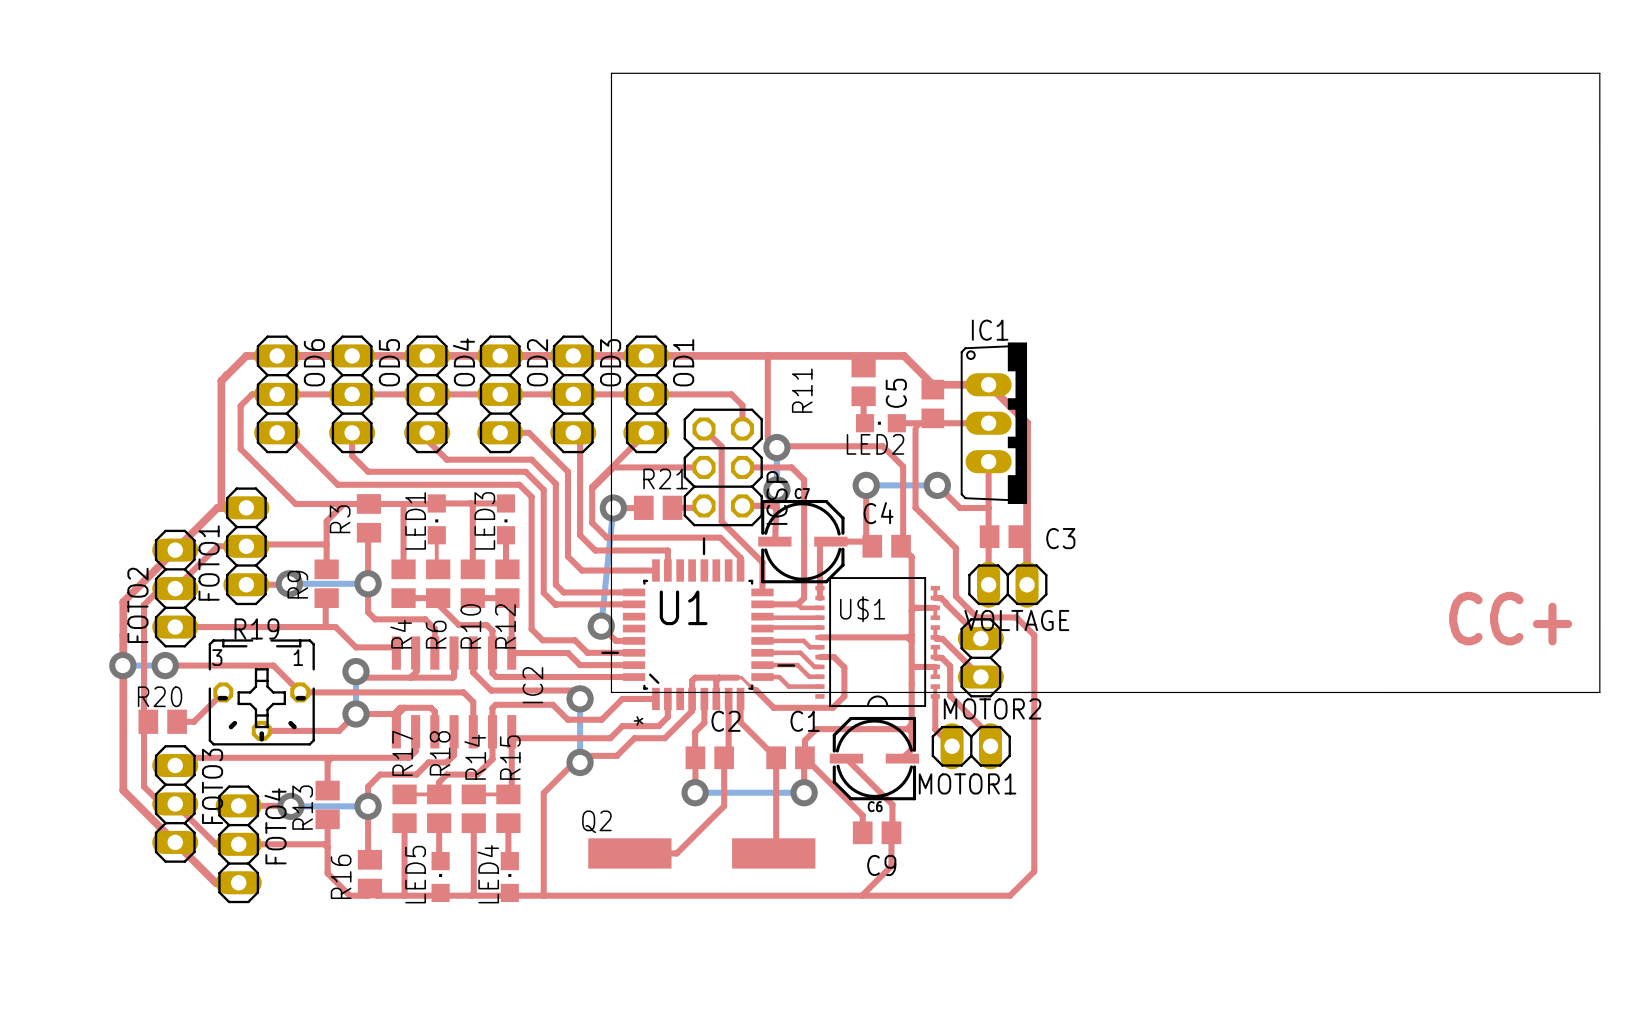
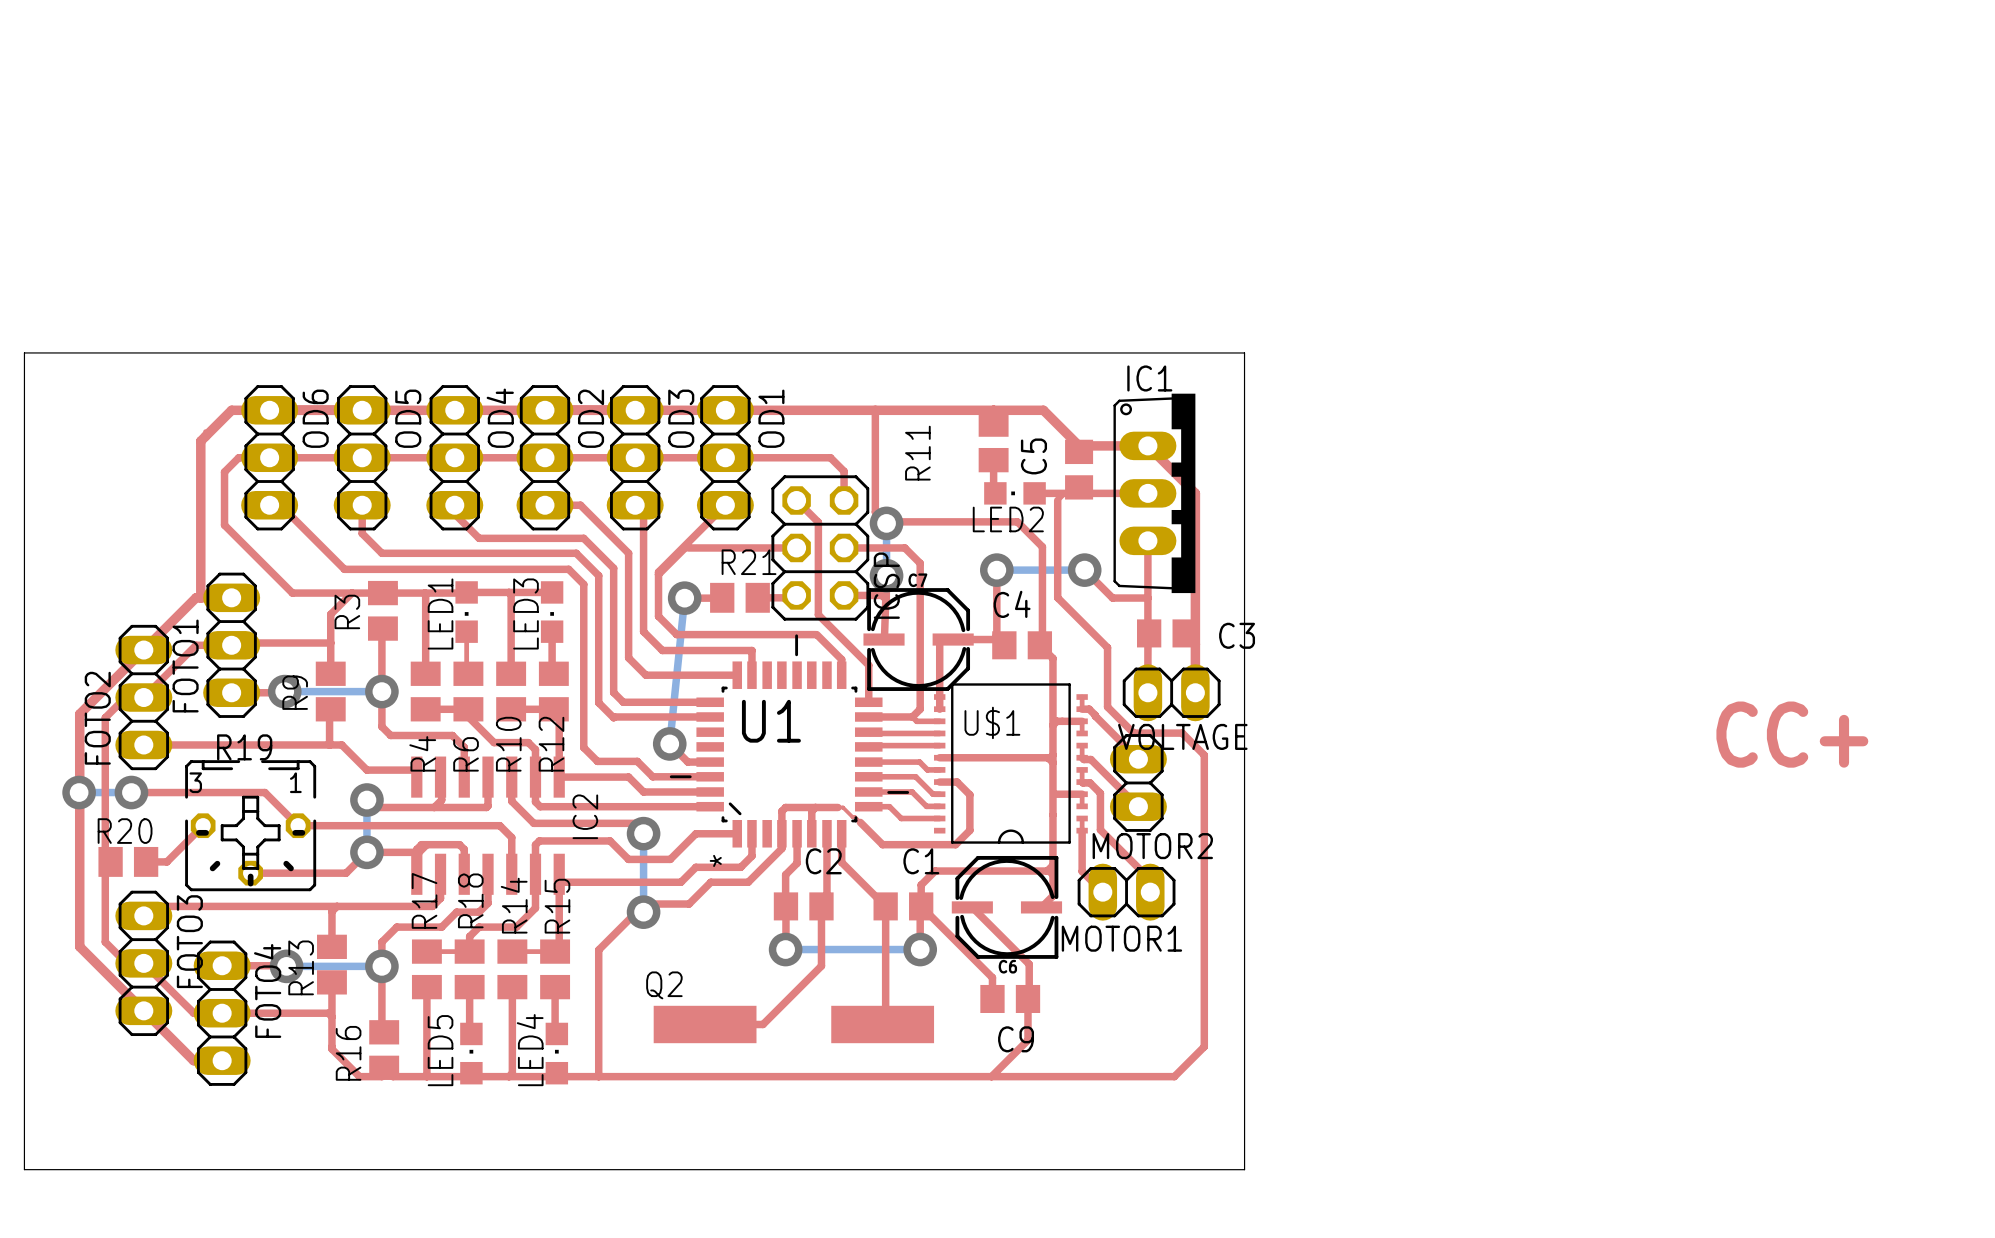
board edge: (611, 73) (1599, 73) (1599, 692) (611, 692) (611, 73) -> none
board edge: none -> (24, 352) (1244, 352) (1244, 1169) (24, 1169) (24, 352)

